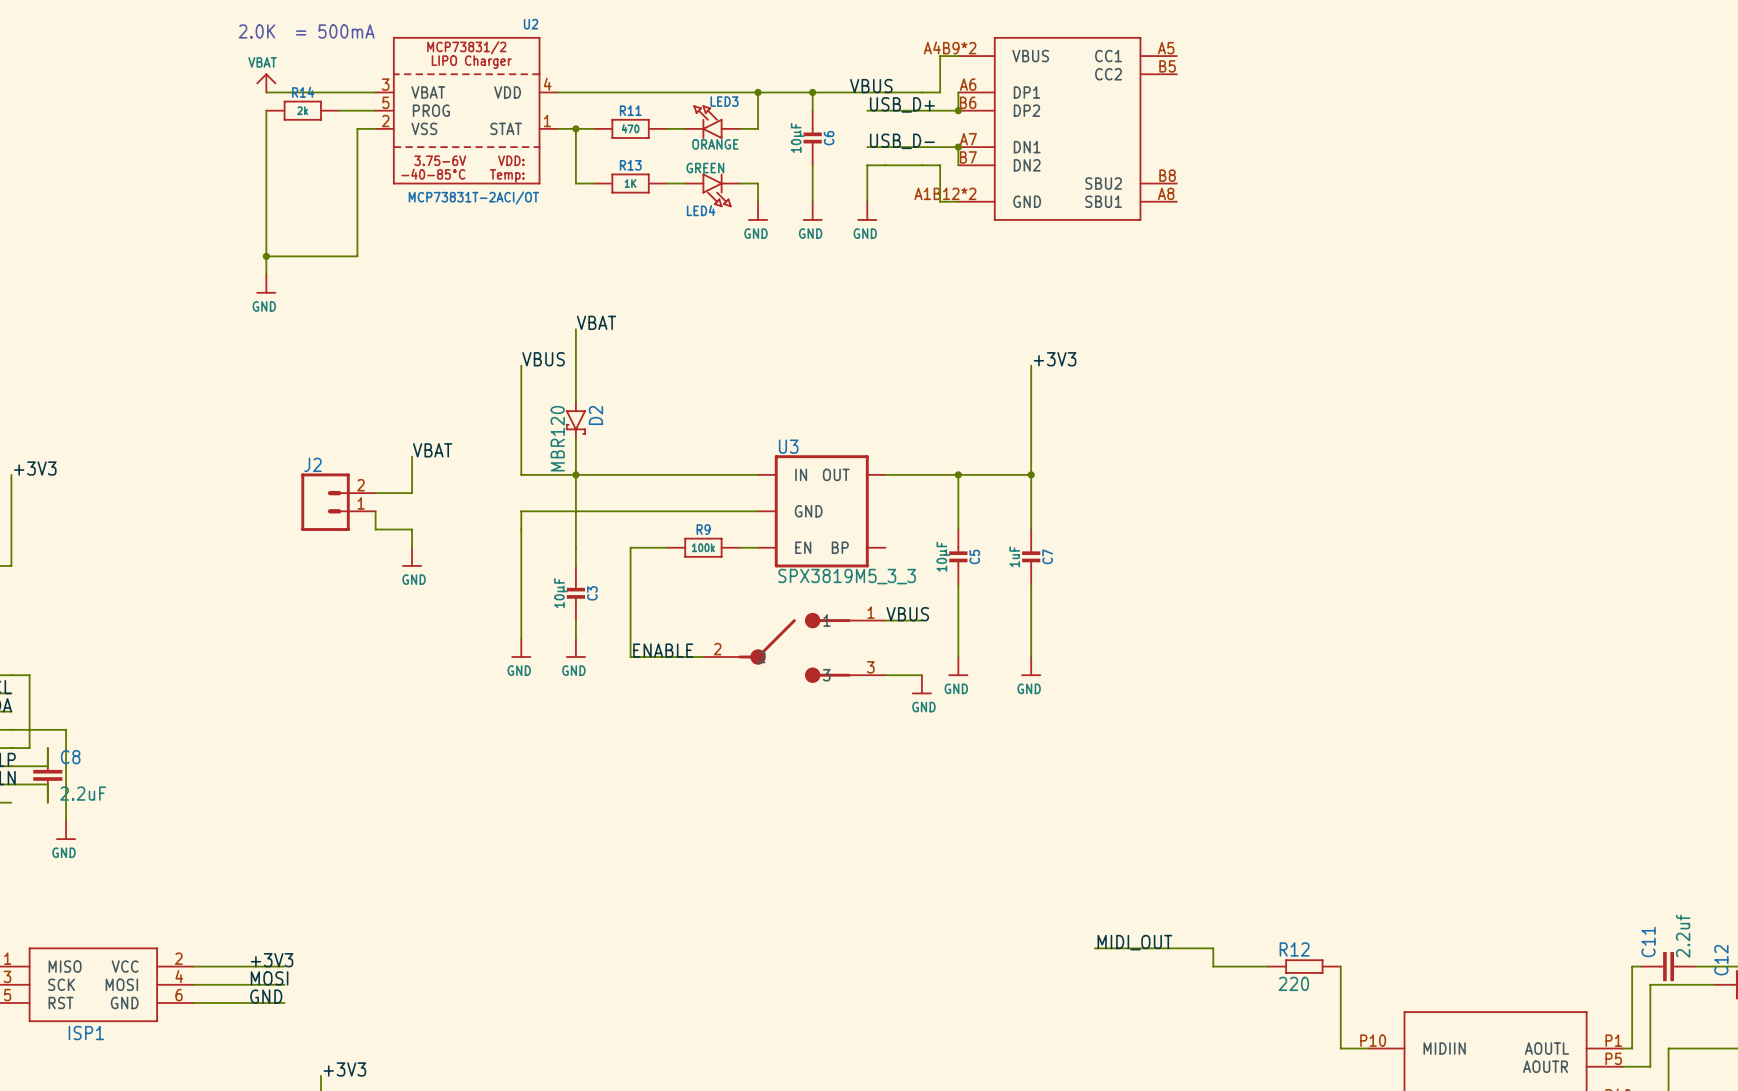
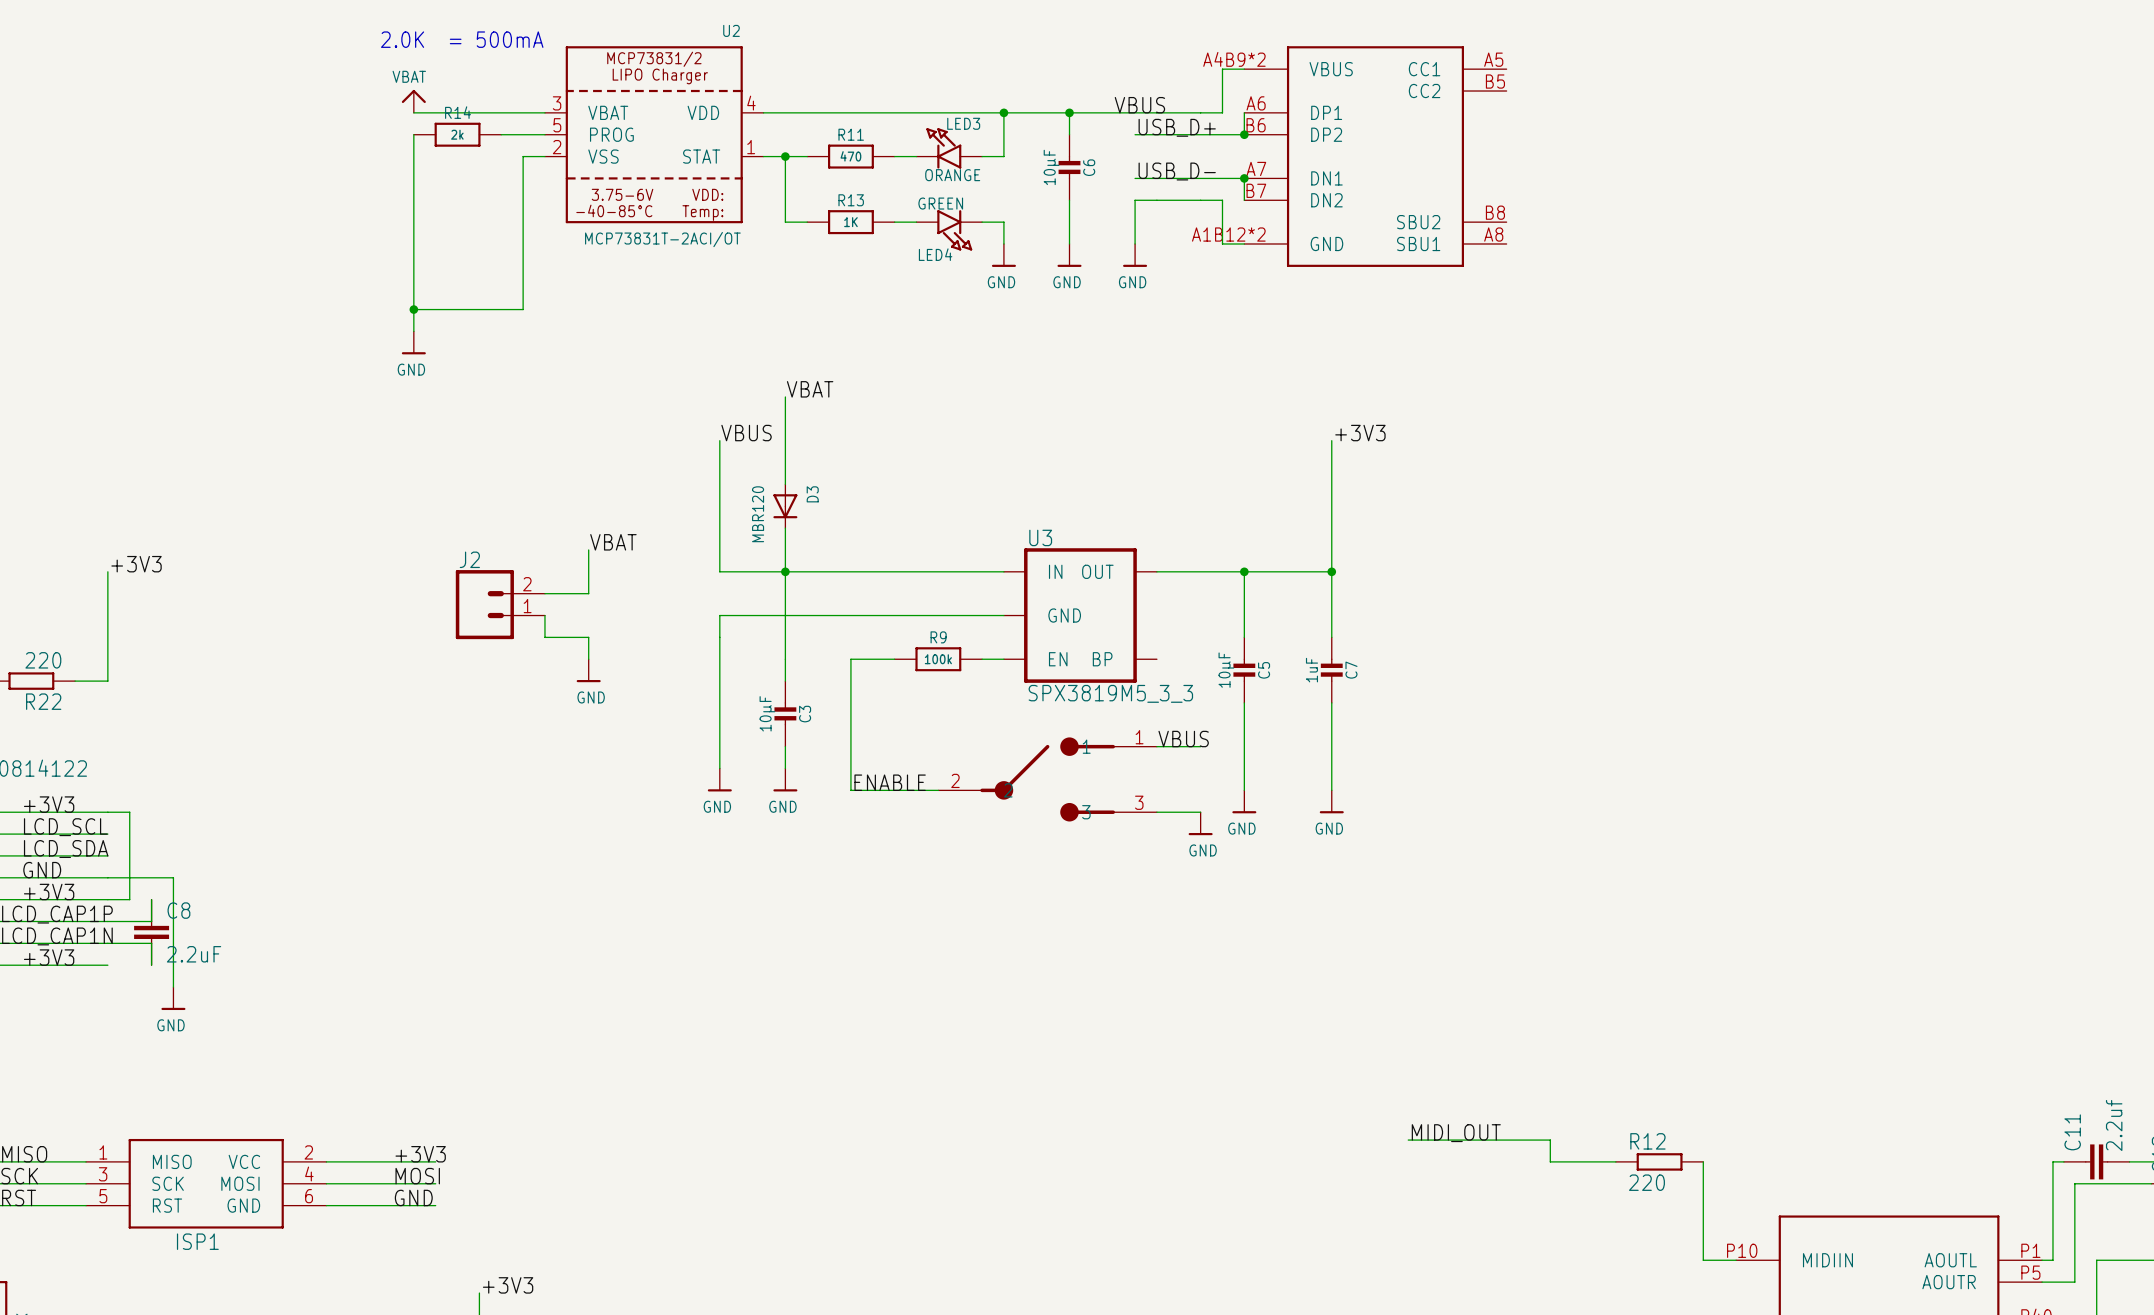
D2: MBR120 (575, 420) -> none
D3: none -> MBR120 (785, 506)

